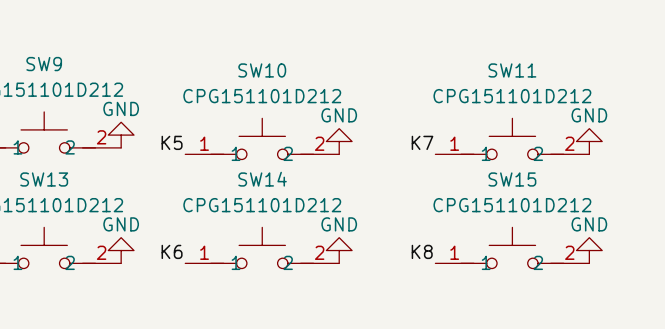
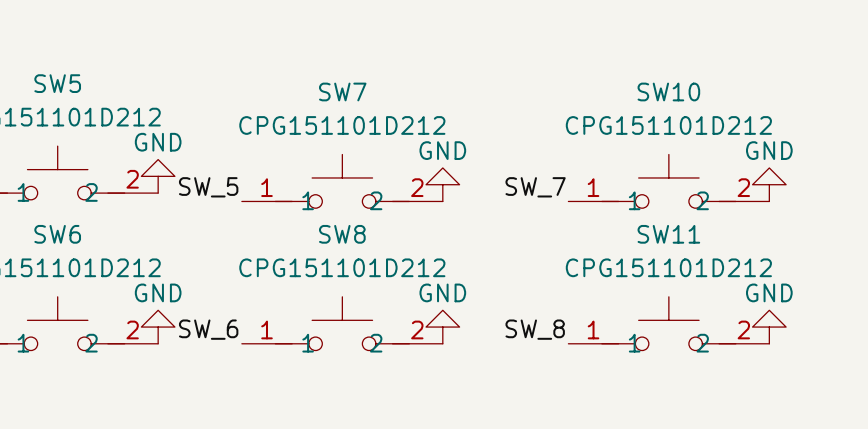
SW9 name: SW9 (44, 64) -> SW5 (57, 83)
SW10 name: SW10 (262, 70) -> SW7 (342, 91)
SW11 name: SW11 (512, 70) -> SW10 (668, 91)
label: K5 (172, 142) -> SW_5 (208, 187)
label: K7 (422, 142) -> SW_7 (535, 187)
SW13 name: SW13 (44, 179) -> SW6 (57, 234)
SW14 name: SW14 (262, 179) -> SW8 (342, 234)
SW15 name: SW15 (512, 179) -> SW11 (668, 234)
label: K6 (172, 251) -> SW_6 (208, 329)
label: K8 (422, 251) -> SW_8 (535, 329)

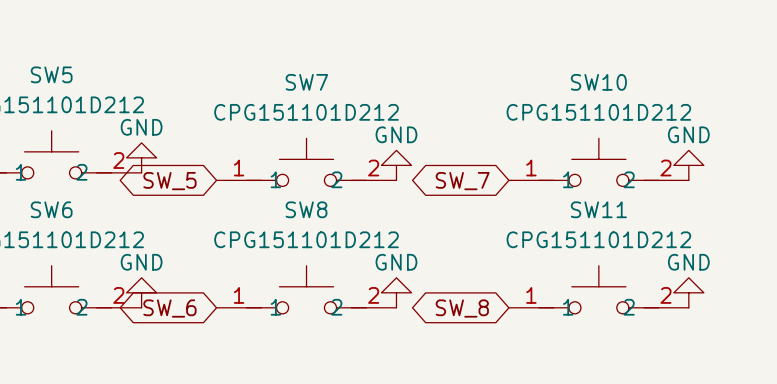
label: SW_5 (208, 187) -> none
label: SW_7 (535, 187) -> none
global label: none -> SW_5 (169, 181)
global label: none -> SW_7 (462, 181)
label: SW_6 (208, 329) -> none
label: SW_8 (535, 329) -> none
global label: none -> SW_6 (169, 308)
global label: none -> SW_8 (462, 308)

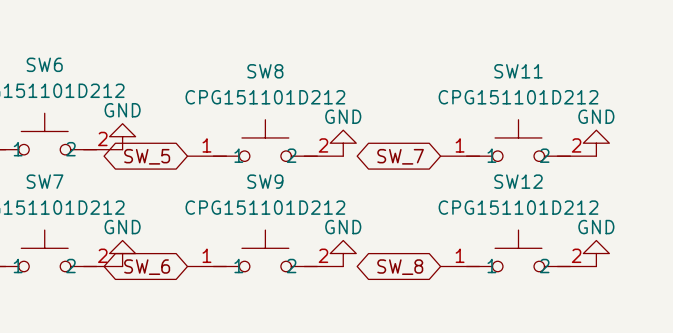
SW5 name: SW5 (51, 74) -> SW6 (44, 64)
SW7 name: SW7 (306, 82) -> SW8 (265, 71)
SW10 name: SW10 (598, 82) -> SW11 (518, 71)
SW6 name: SW6 (51, 209) -> SW7 (45, 181)
SW8 name: SW8 (306, 209) -> SW9 (265, 181)
SW11 name: SW11 (598, 209) -> SW12 (518, 181)

